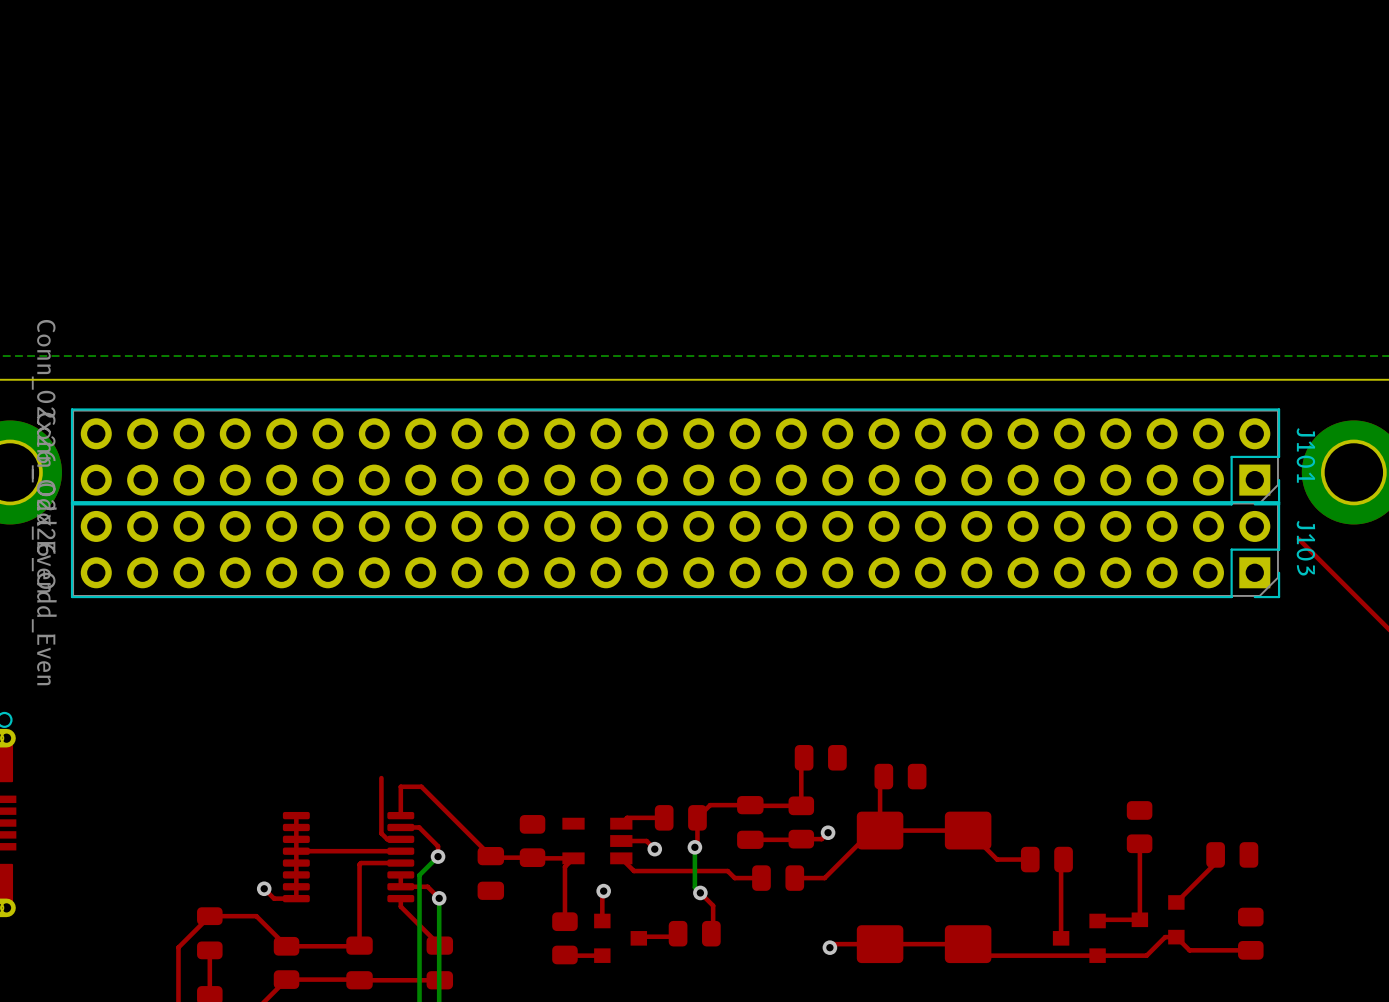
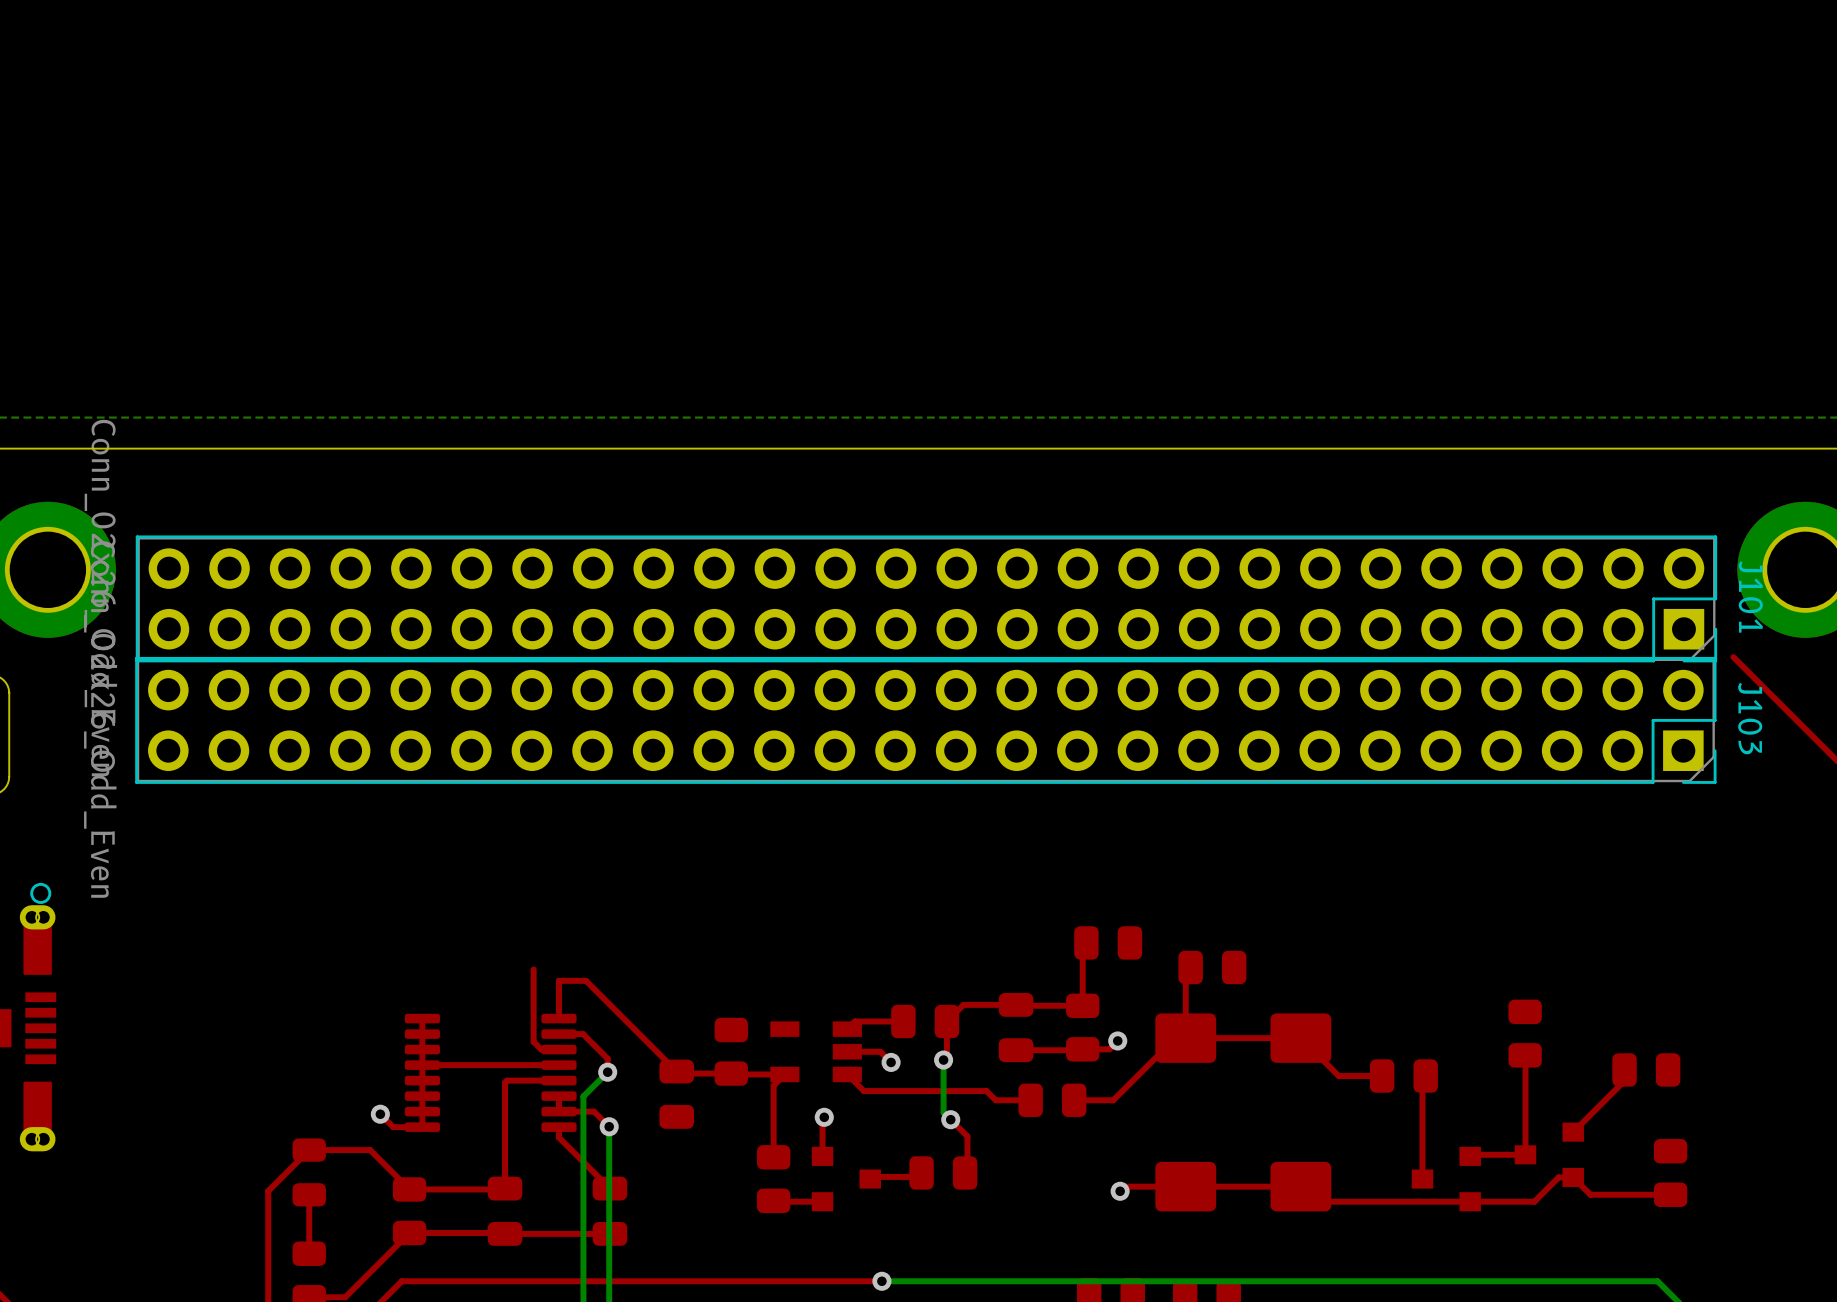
J101 position: (675, 456) -> (926, 598)
J103 position: (675, 549) -> (925, 720)

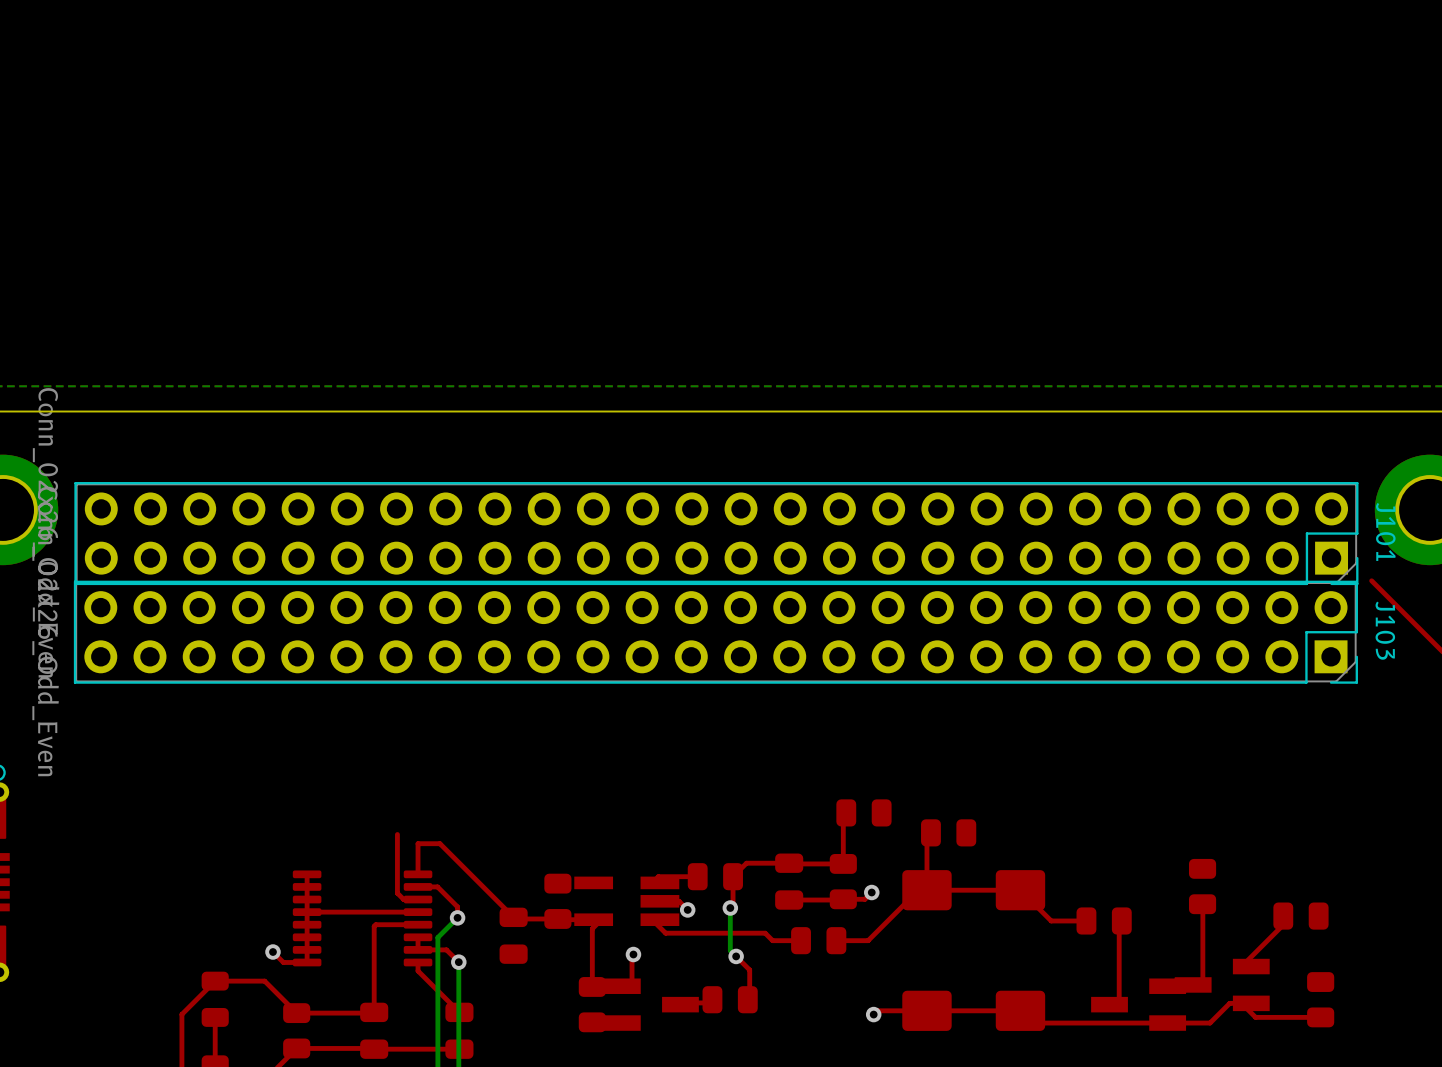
part footprint: [770, 1021, 862, 1083] -> [574, 876, 680, 927]
part footprint: [1514, 1122, 1584, 1188] -> [1174, 958, 1270, 1012]
part footprint: [811, 1146, 881, 1212] -> [603, 978, 699, 1031]
part footprint: [1411, 1146, 1481, 1212] -> [1091, 978, 1187, 1031]

